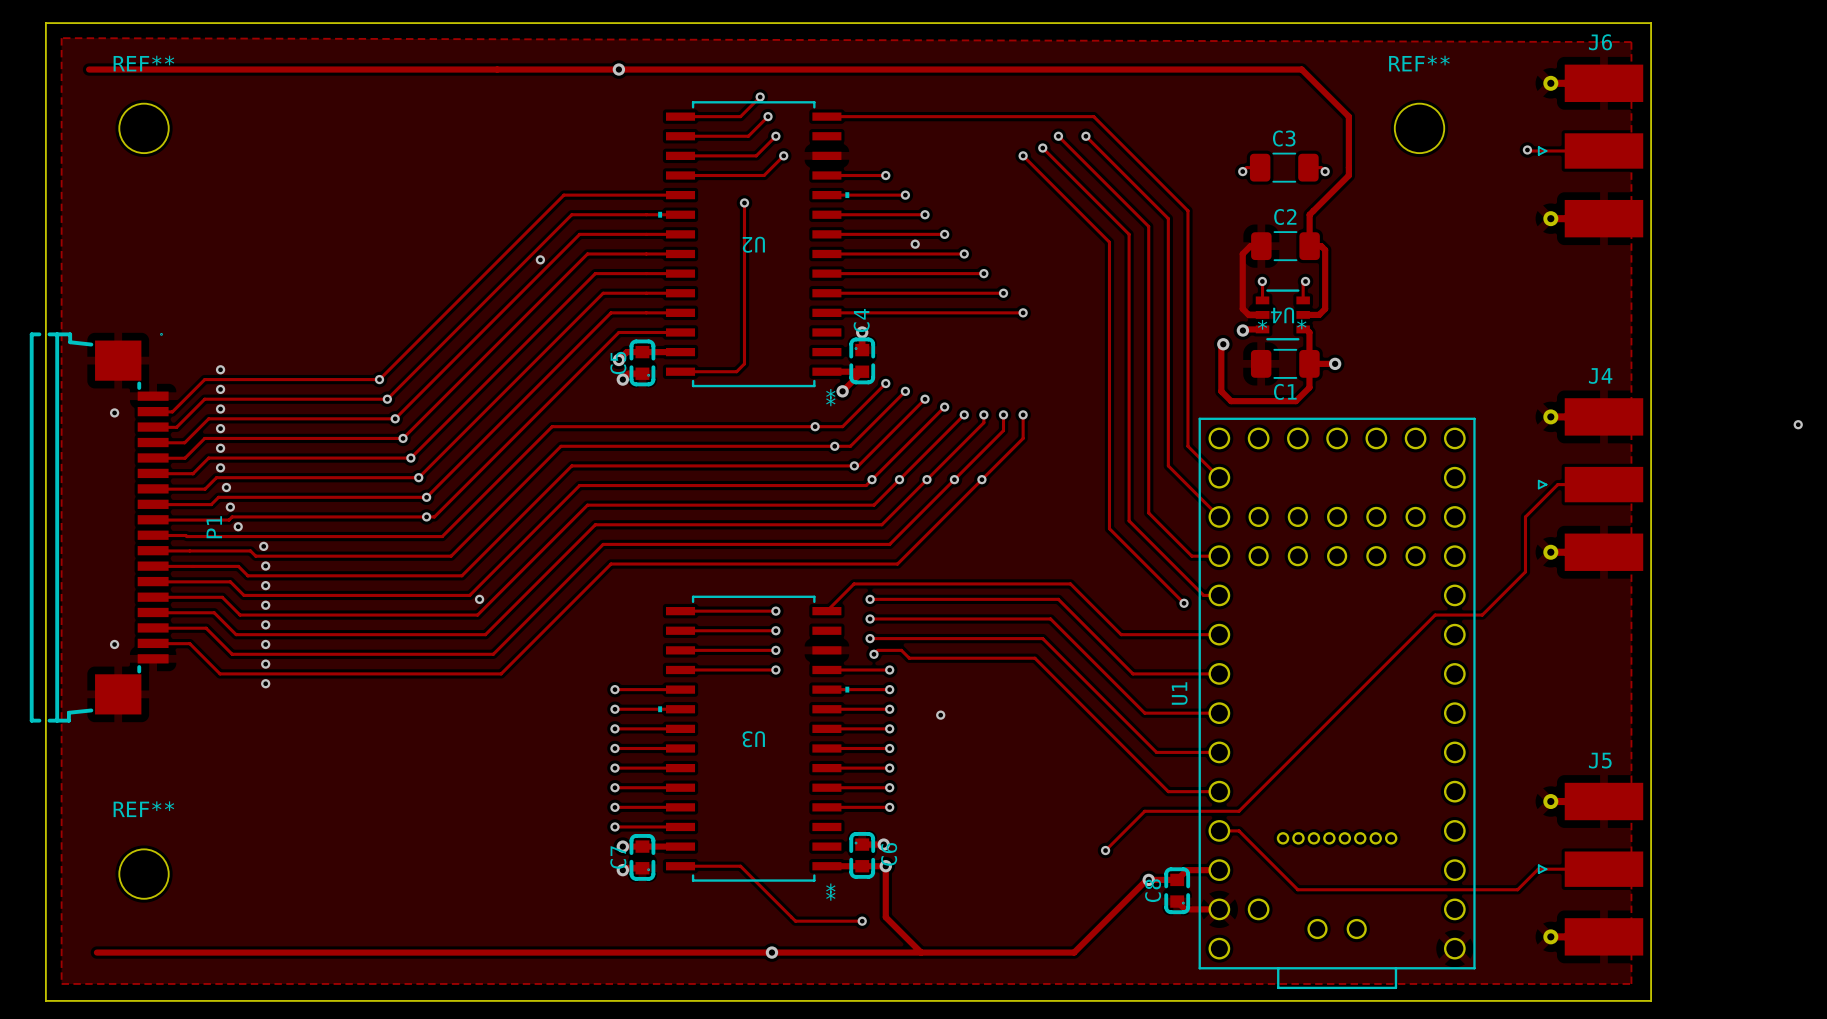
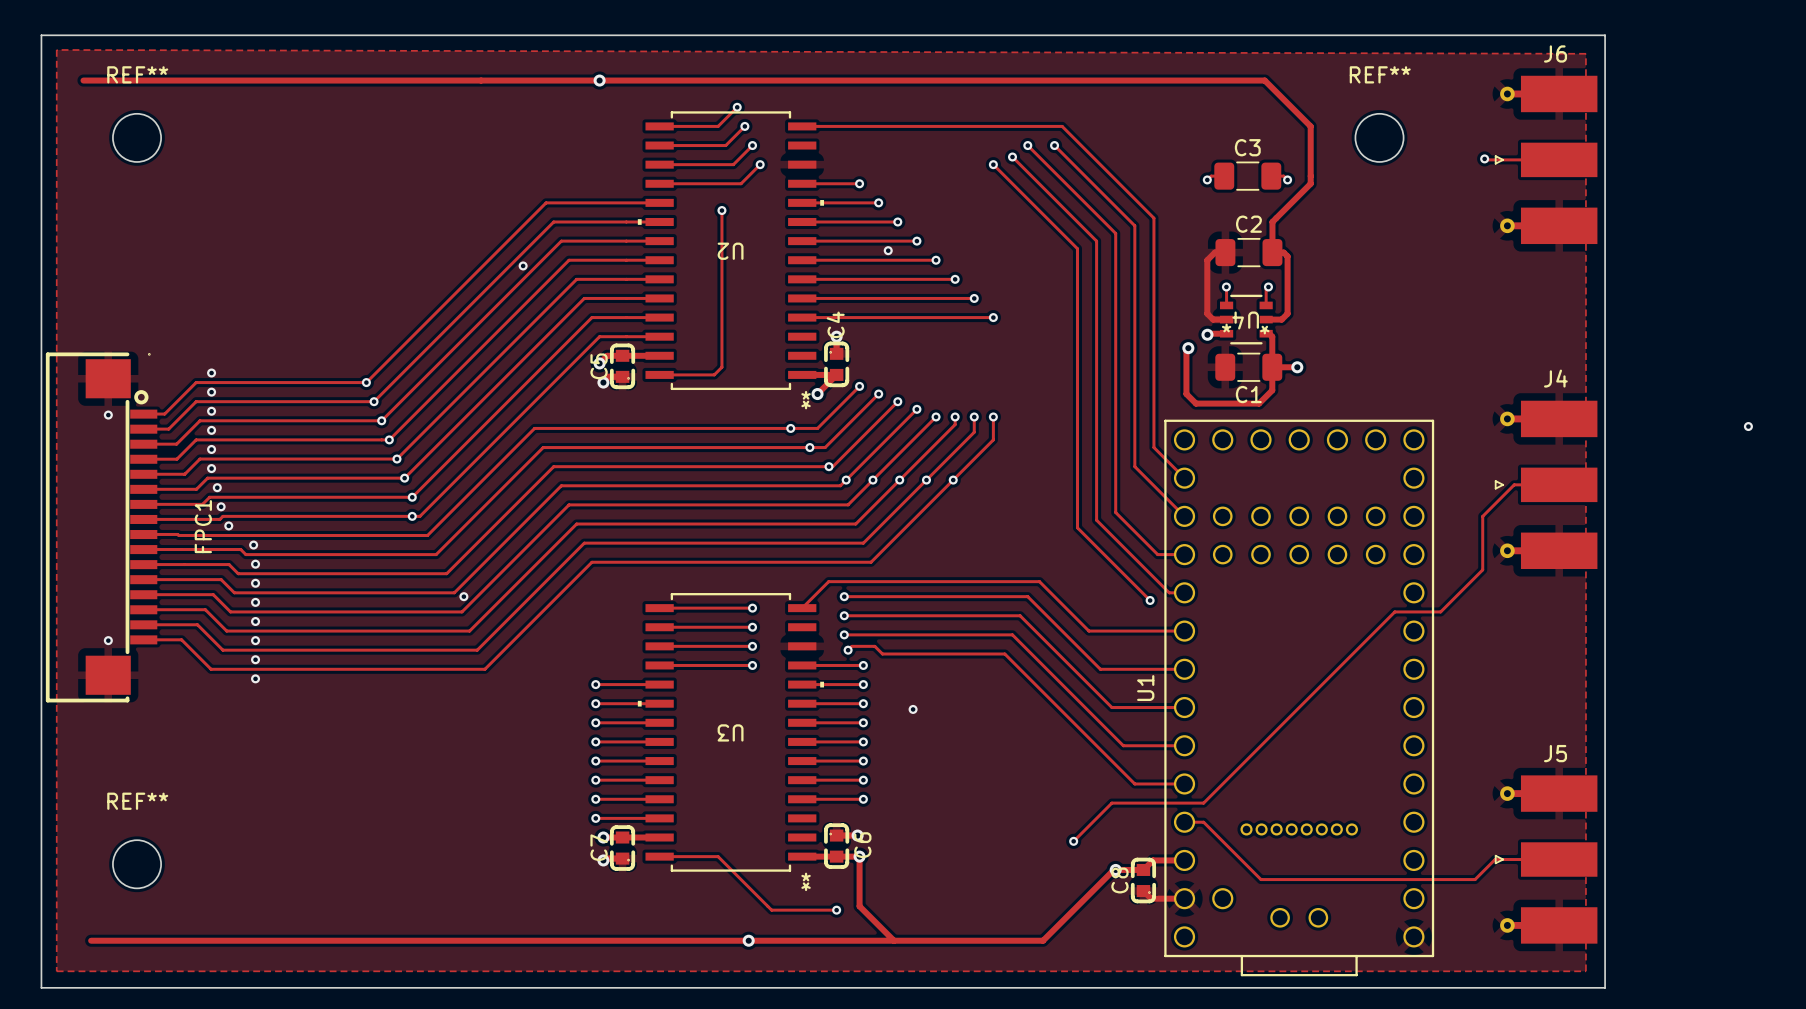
P1: (99, 527) -> none
FPC1: none -> (101, 527)

